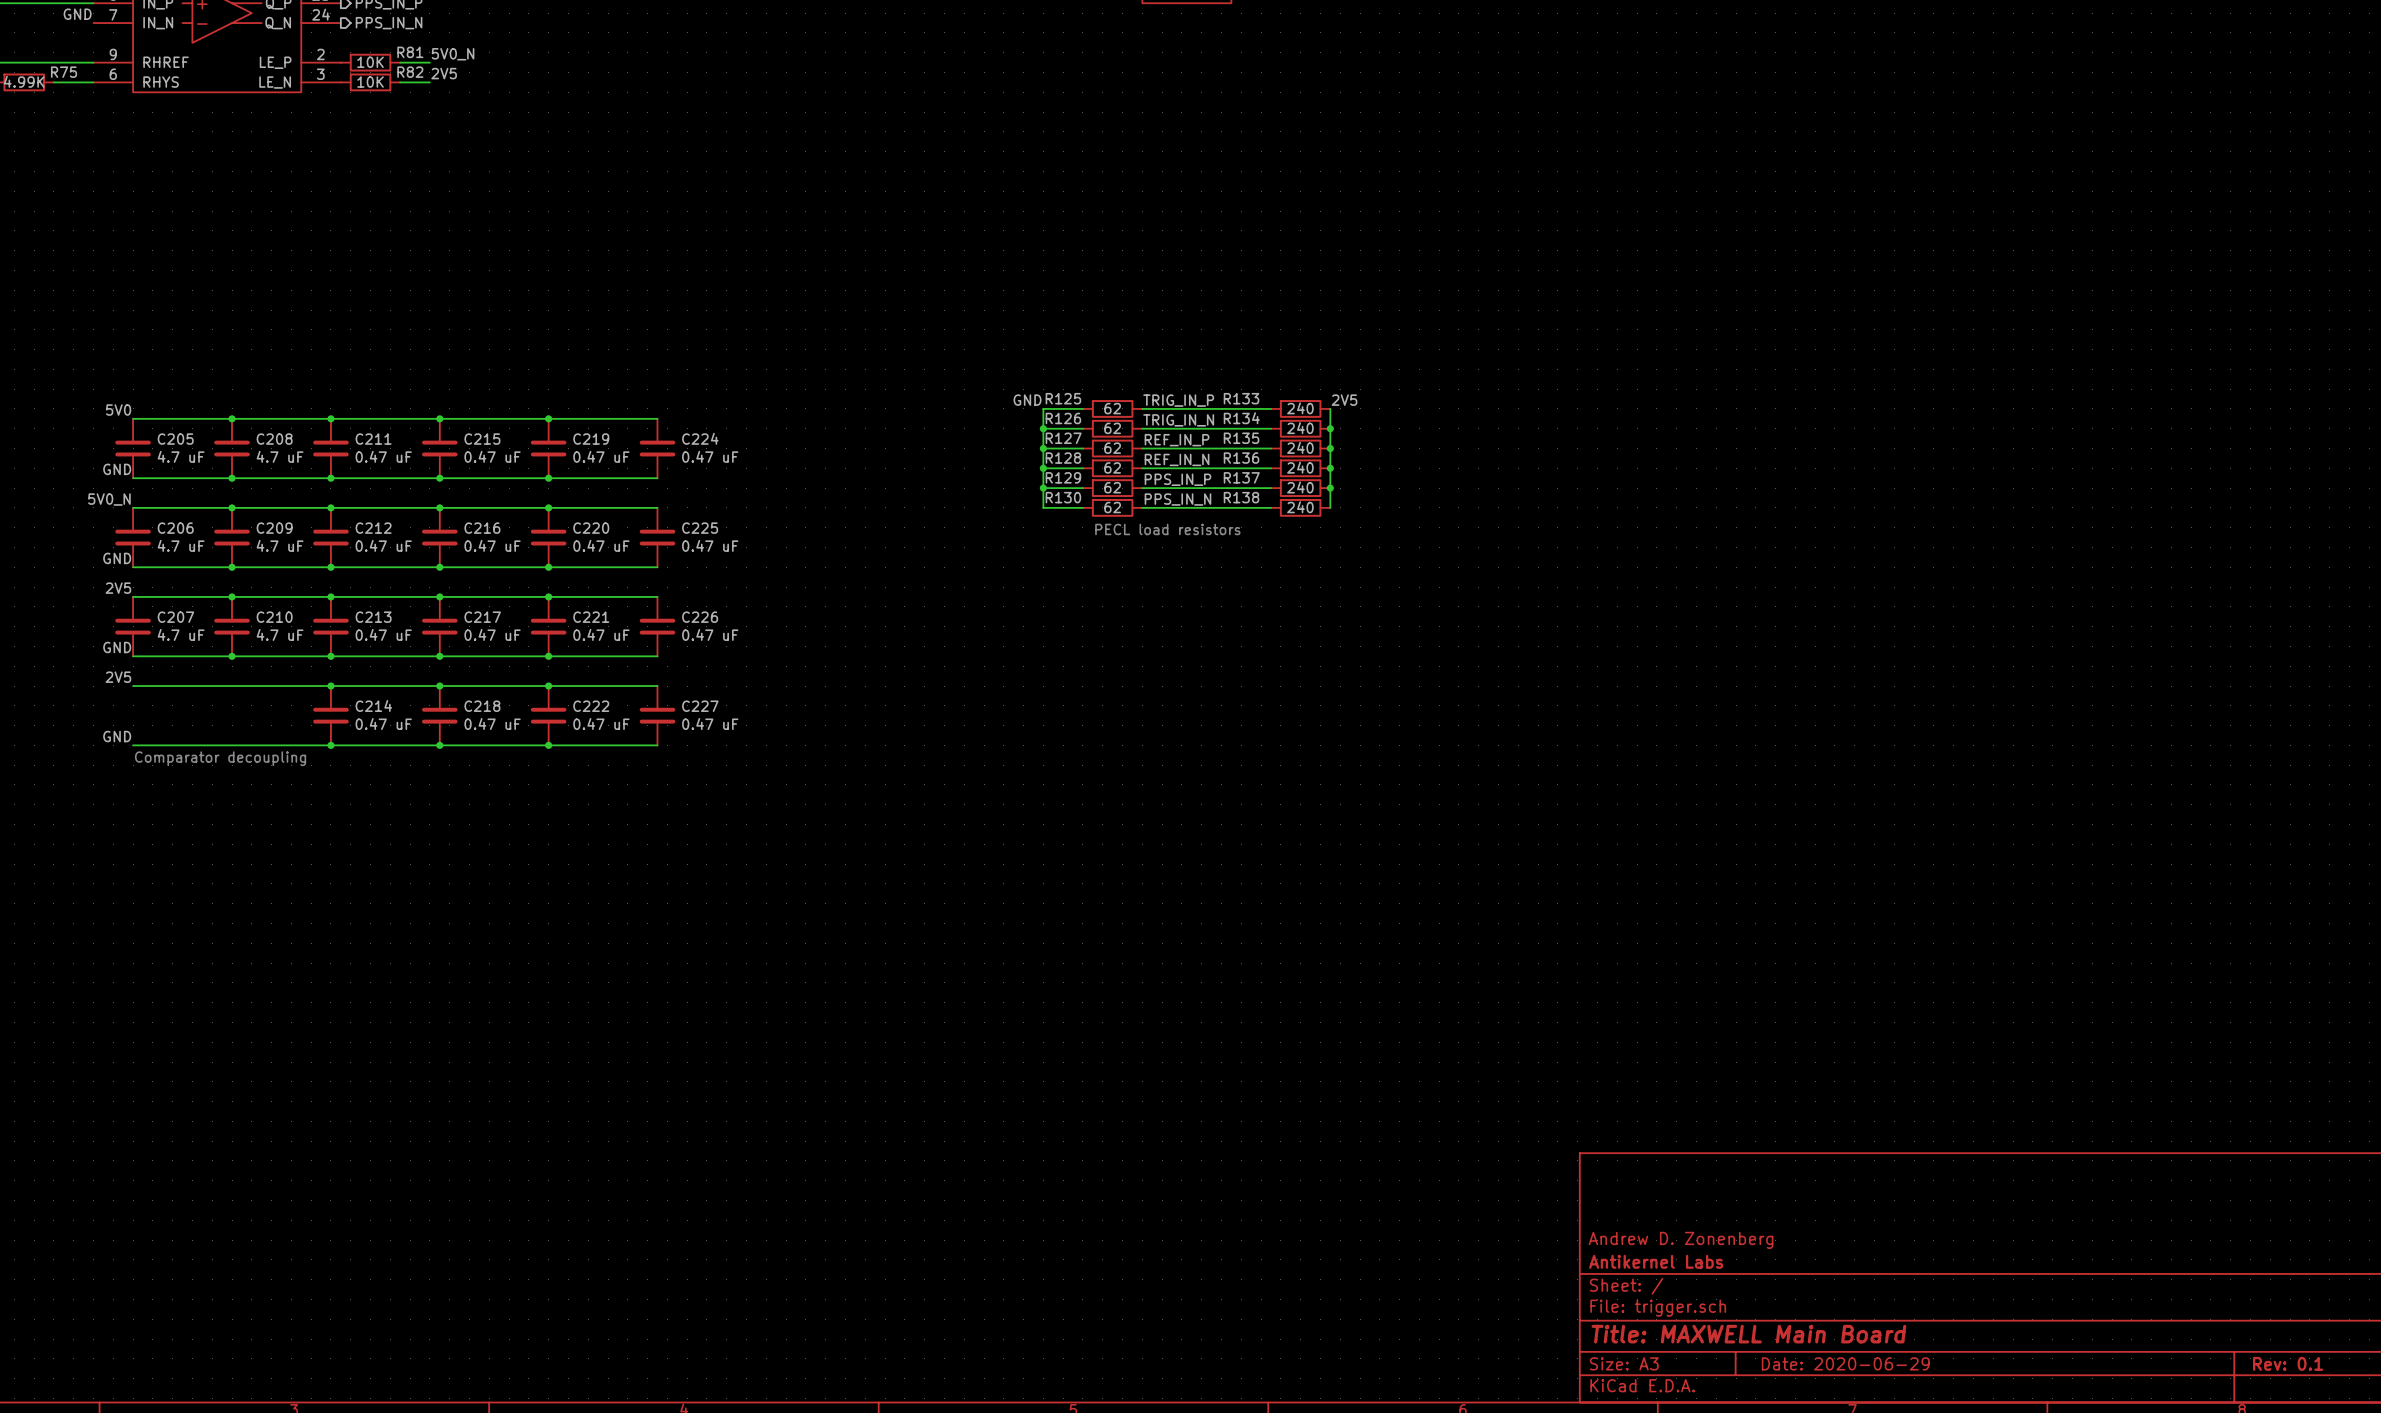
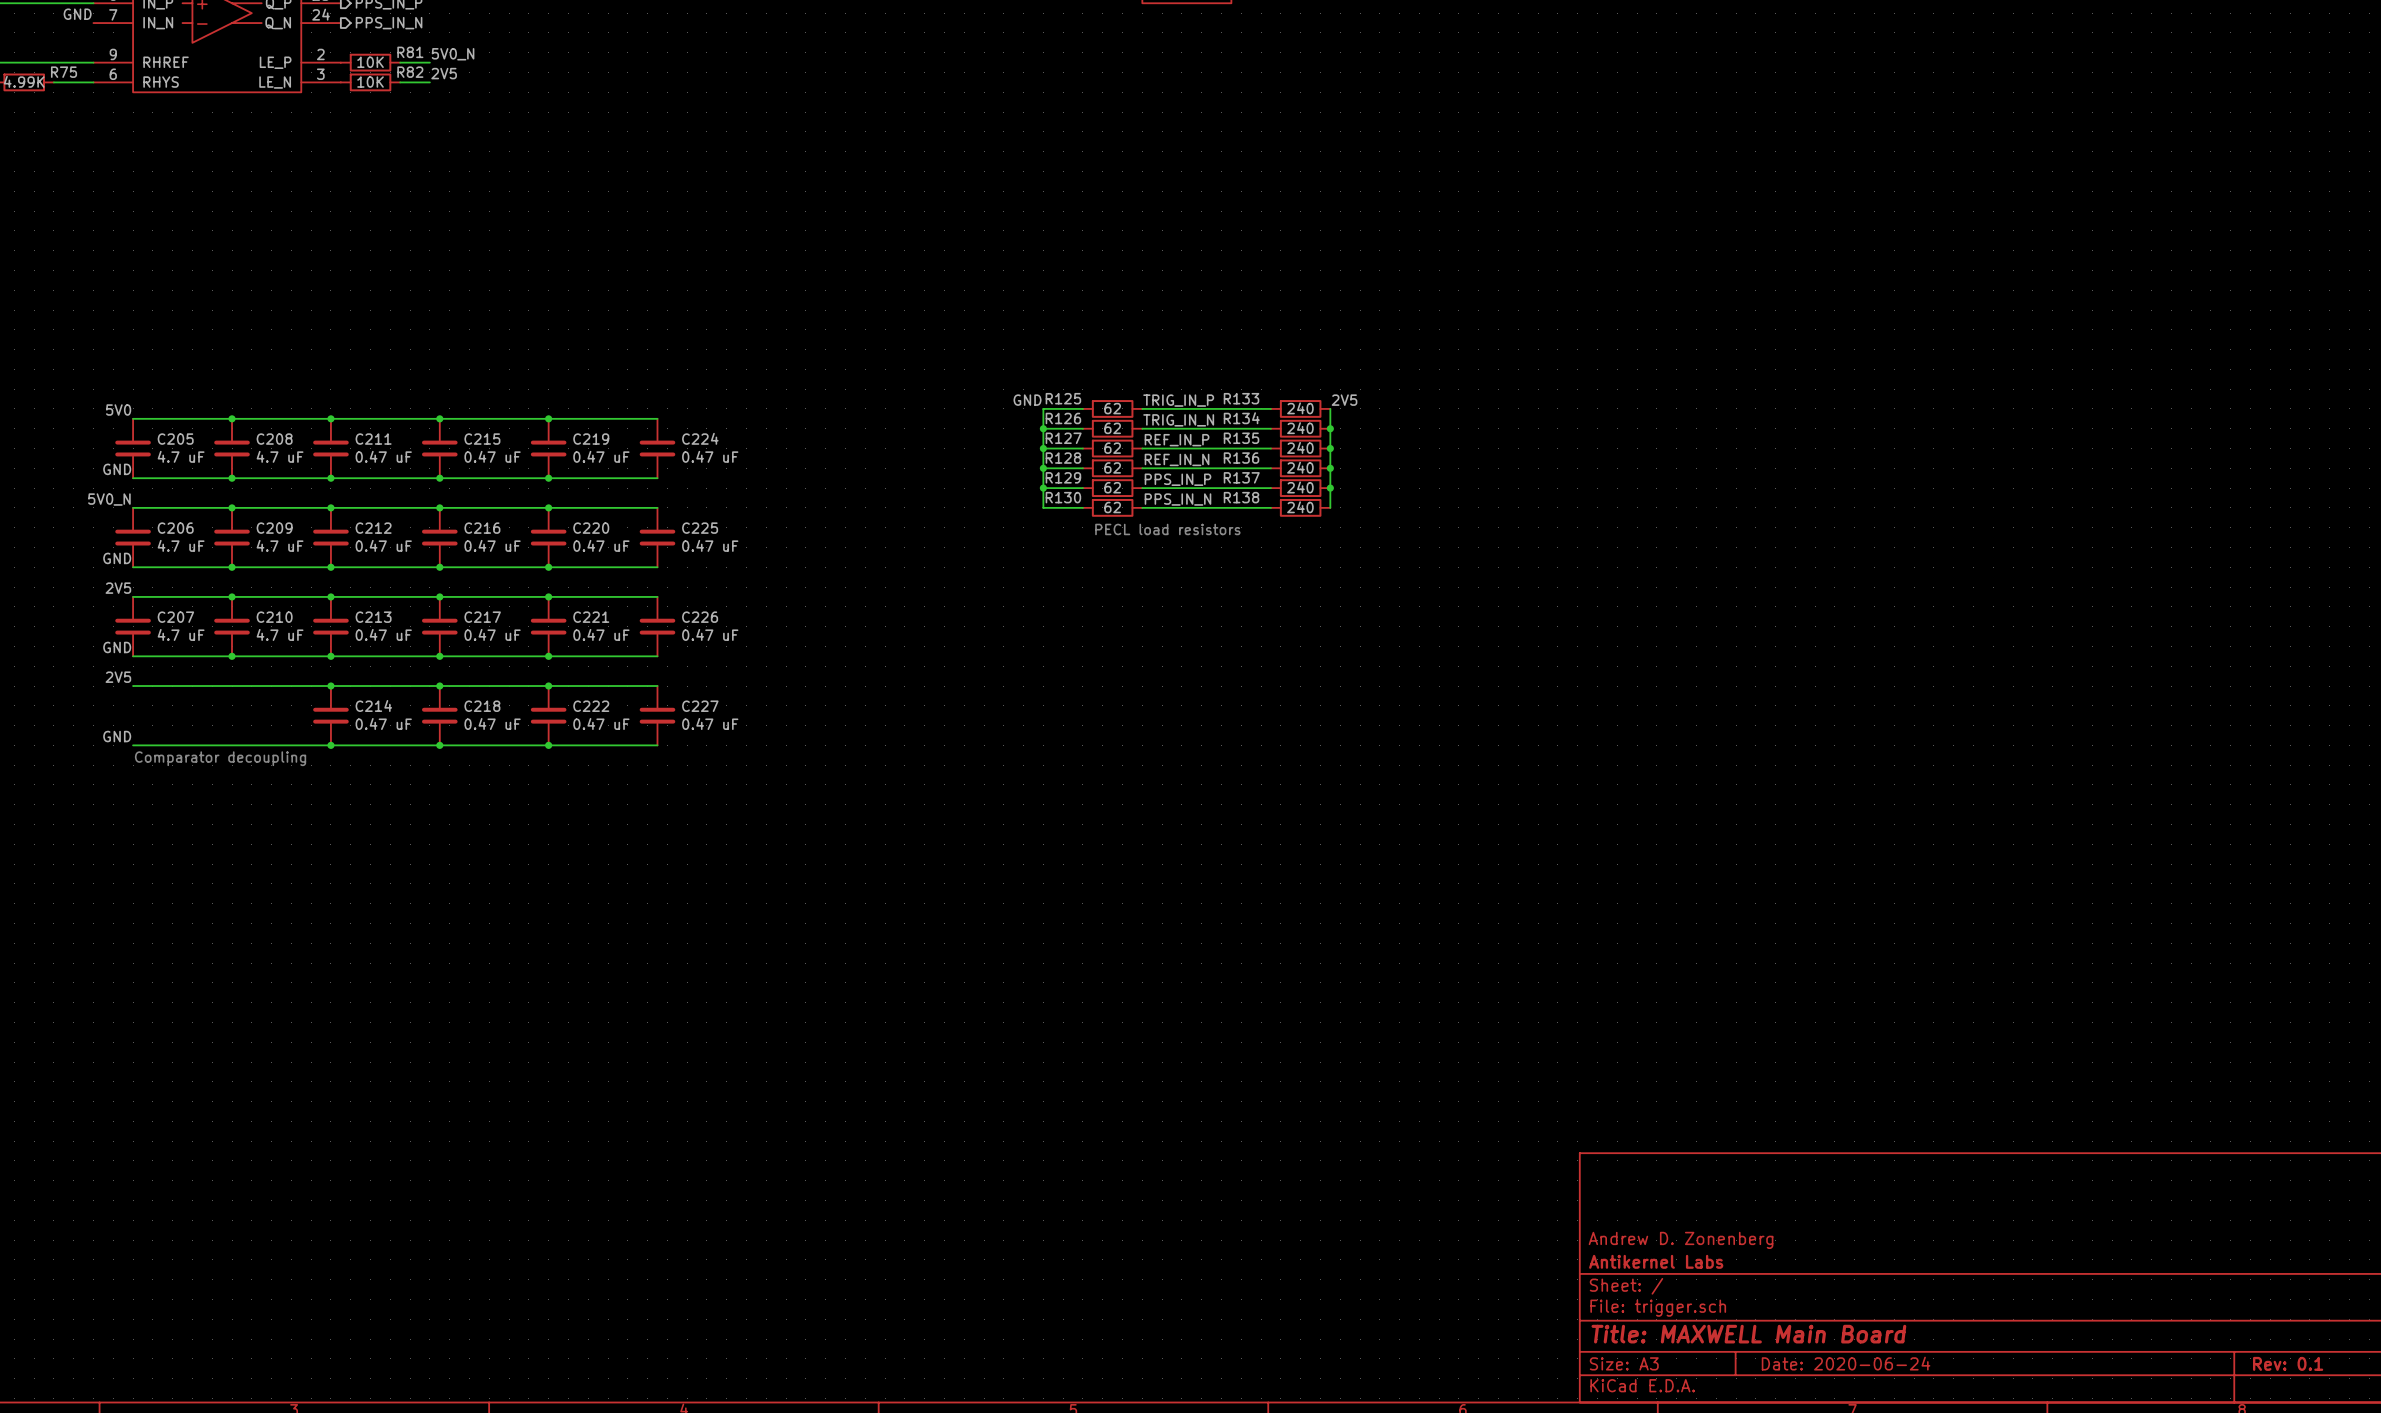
title block: Date: 2020-06-29 (1845, 1363) -> Date: 2020-06-24 (1846, 1363)

